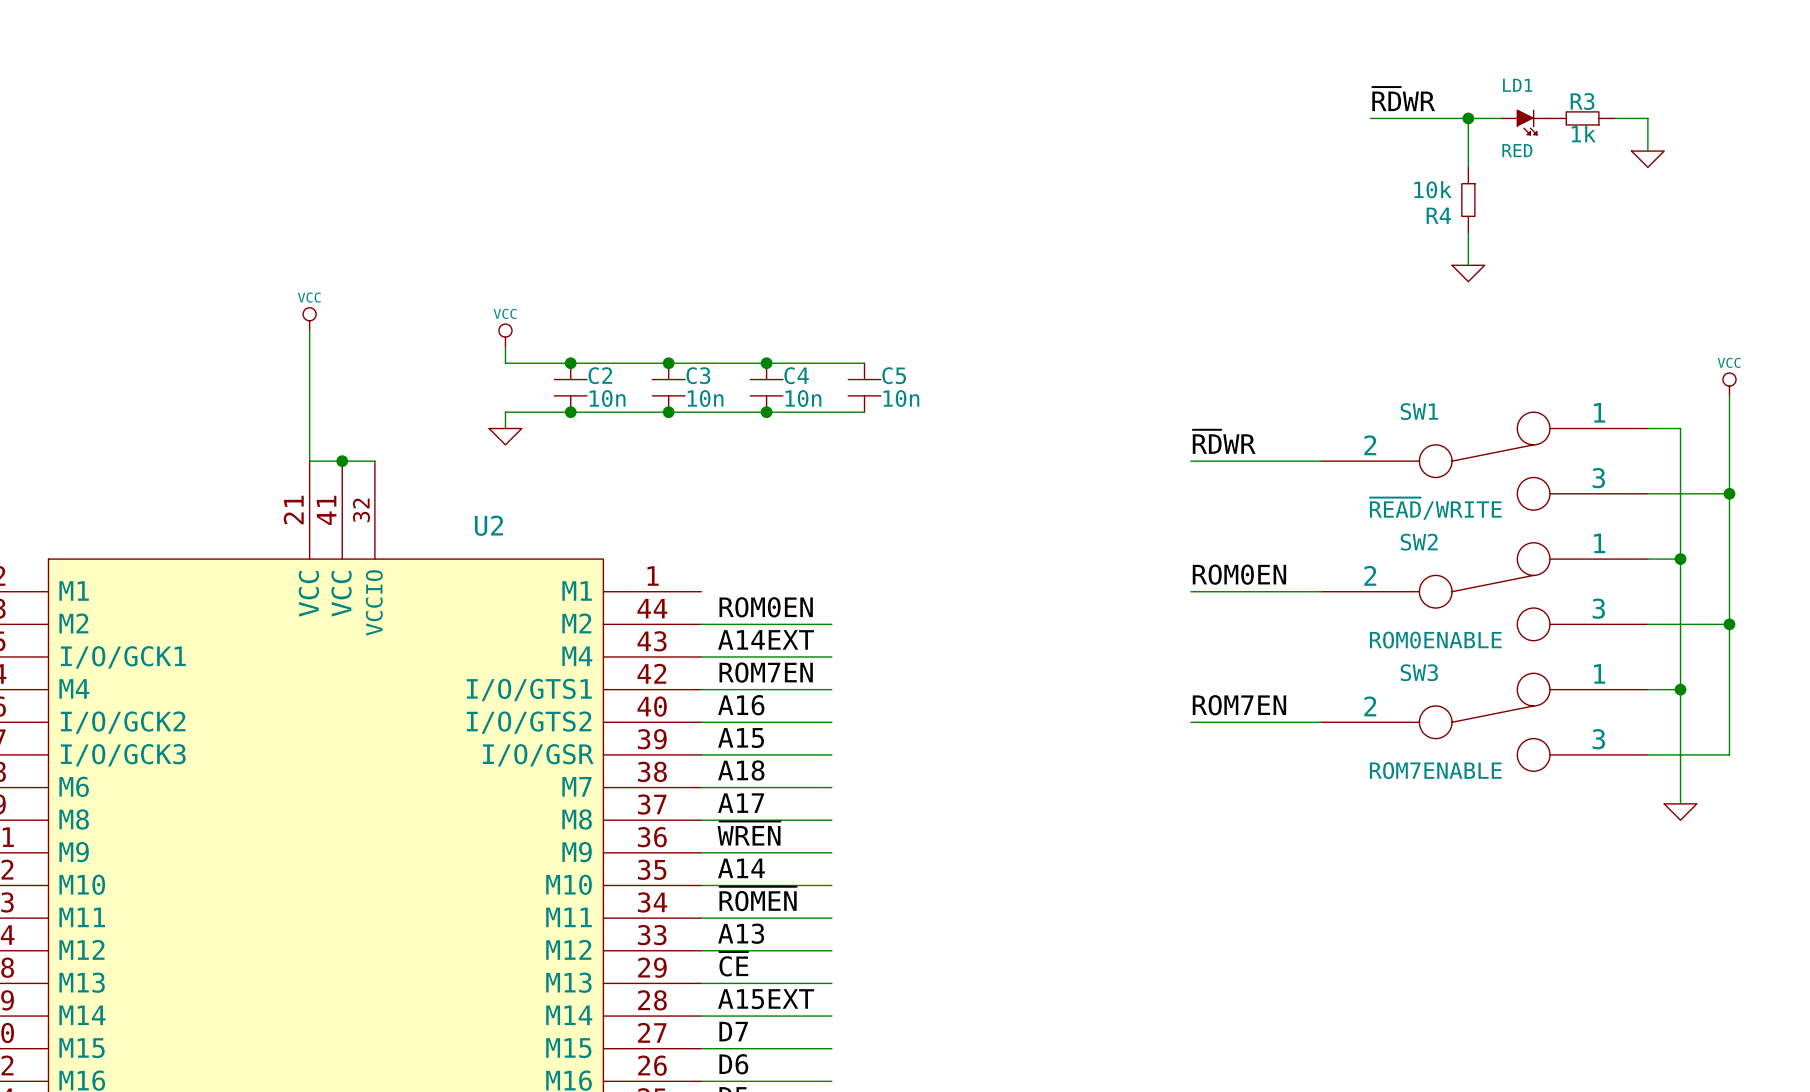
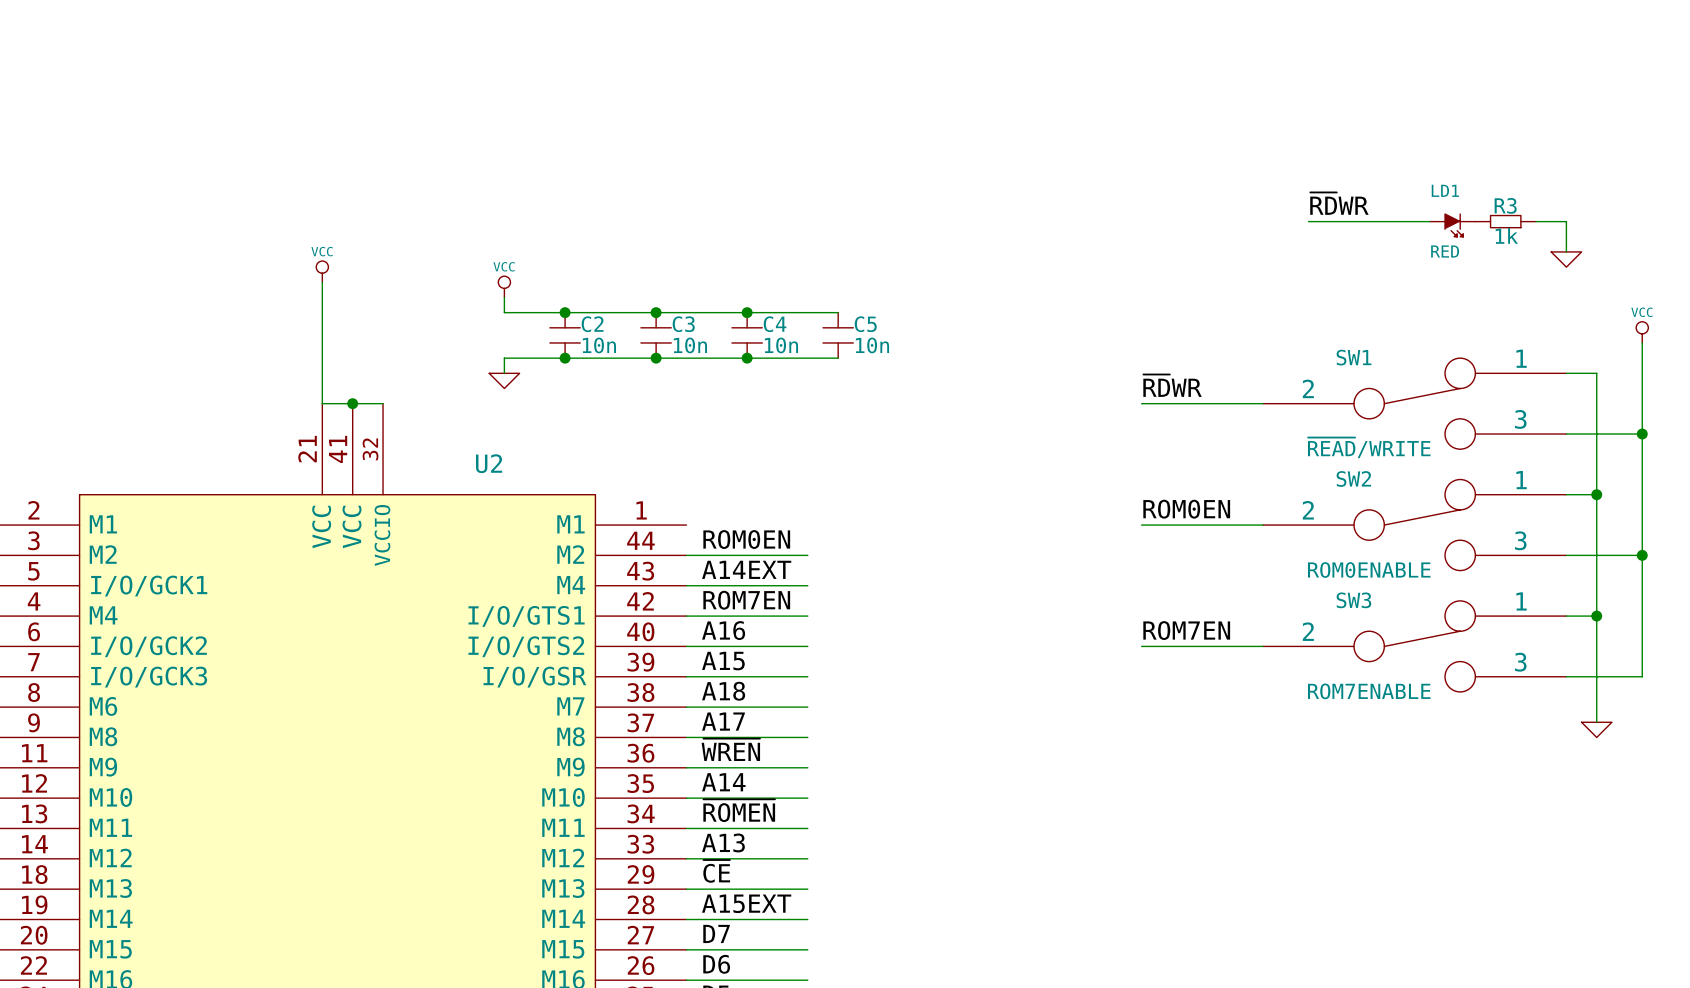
label position: ~{RD}WR (1403, 99) -> ~{RD}WR (1339, 203)
wire: (1370, 118) (1501, 118) -> (1308, 221) (1429, 221)
wire: (1468, 118) (1468, 167) -> none
junction: (1468, 118) -> none
R3 position: (1582, 118) -> (1505, 221)
wire: (1615, 118) (1647, 118) (1647, 151) -> (1536, 221) (1566, 221) (1566, 251)
LD1 position: (1525, 122) -> (1452, 225)
power symbol: (1647, 159) -> none
R4: 10k (1468, 200) -> none
wire: (1468, 232) (1468, 265) -> none
power symbol: (1468, 273) -> none
power symbol: none -> (1566, 259)

